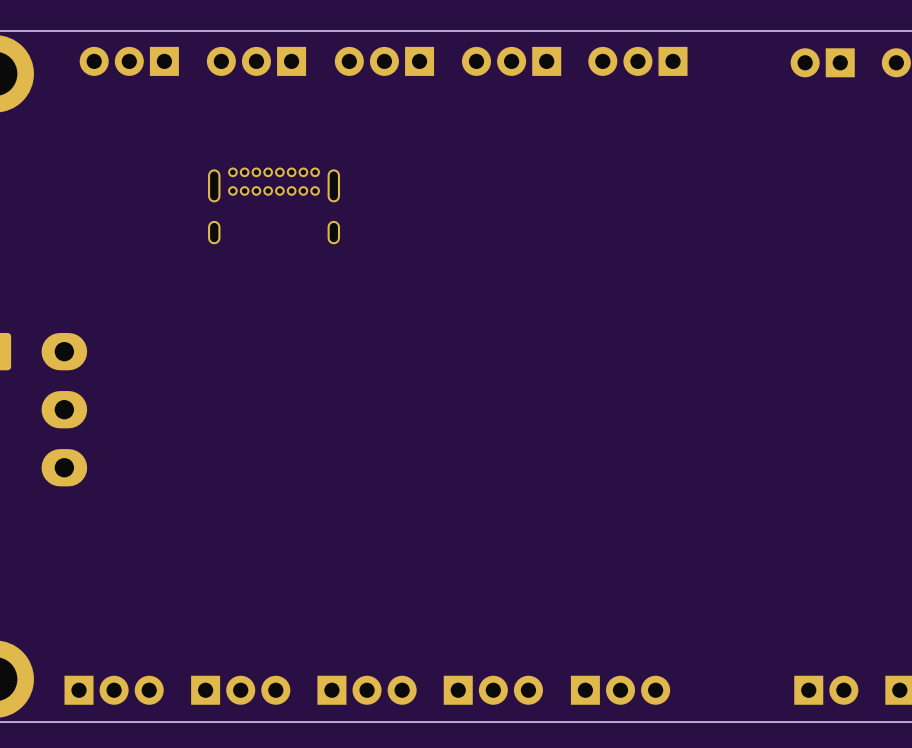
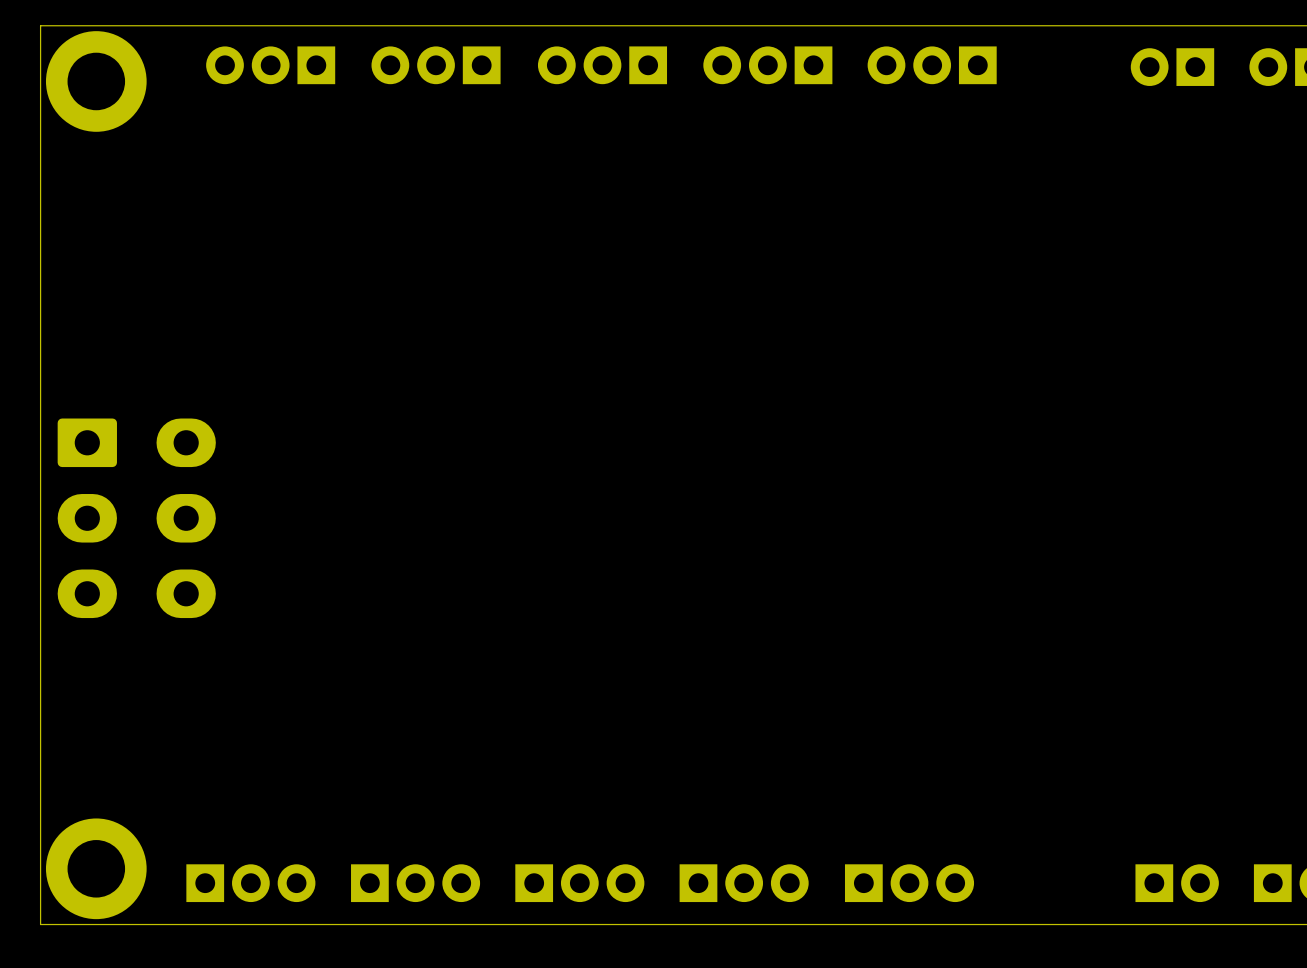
part: (274, 205) -> none

